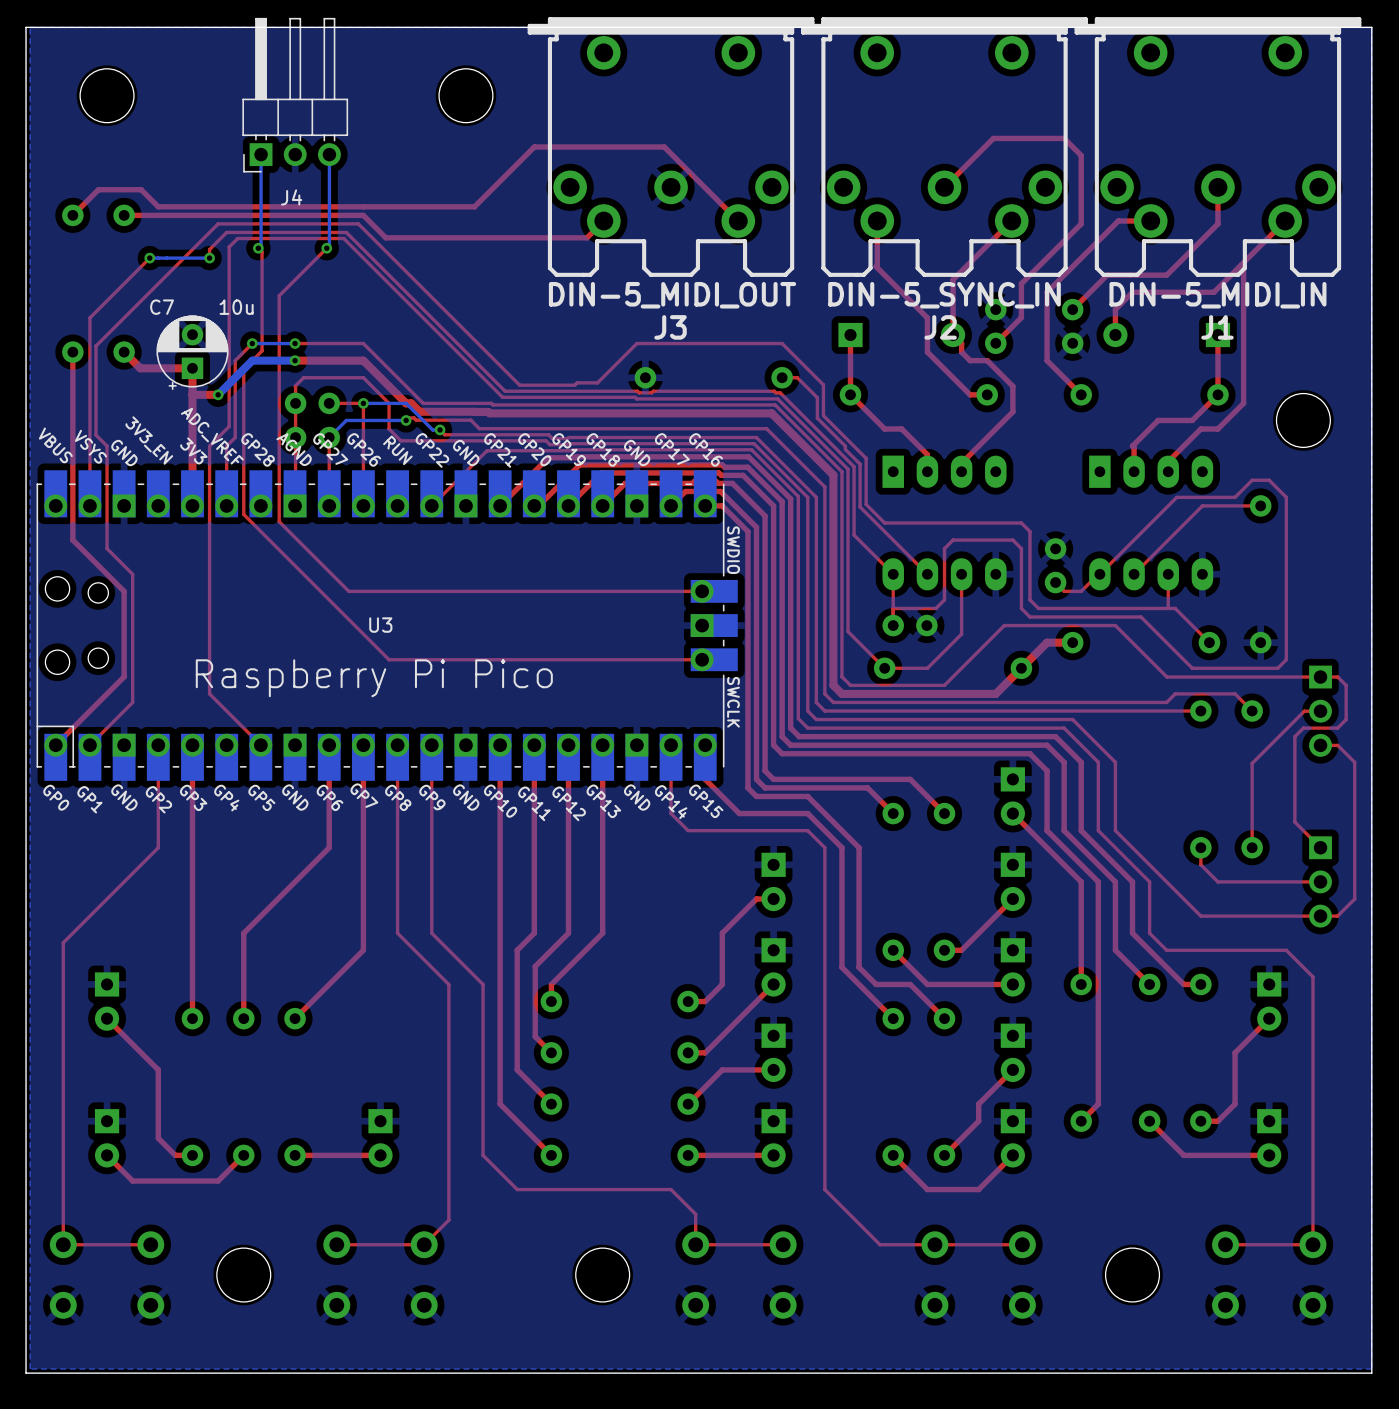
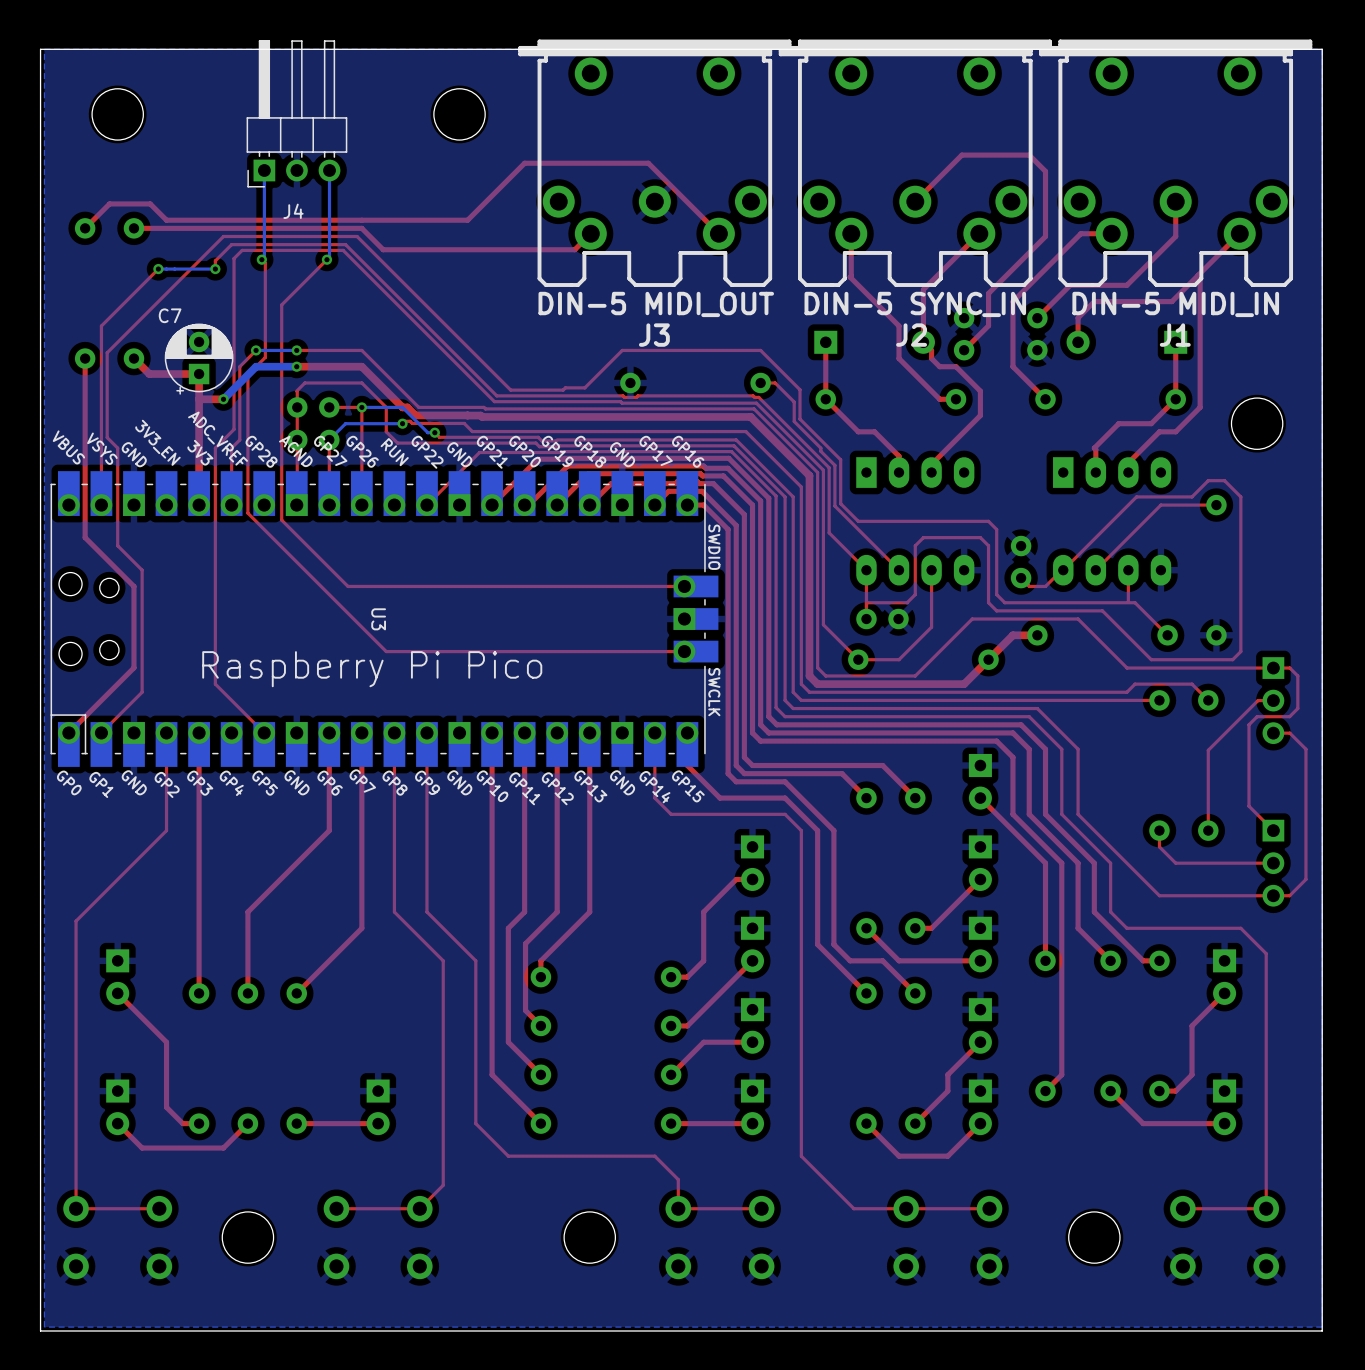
J3 value: DIN-5_MIDI_OUT (672, 295) -> DIN-5 MIDI_OUT (656, 304)
J2 value: DIN-5_SYNC_IN (944, 295) -> DIN-5 SYNC_IN (915, 304)
J1 value: DIN-5_MIDI_IN (1217, 295) -> DIN-5 MIDI_IN (1175, 304)
C7 value: 10u (236, 307) -> none
U3 name rotation: 0° (380, 625) -> 90° clockwise (378, 619)

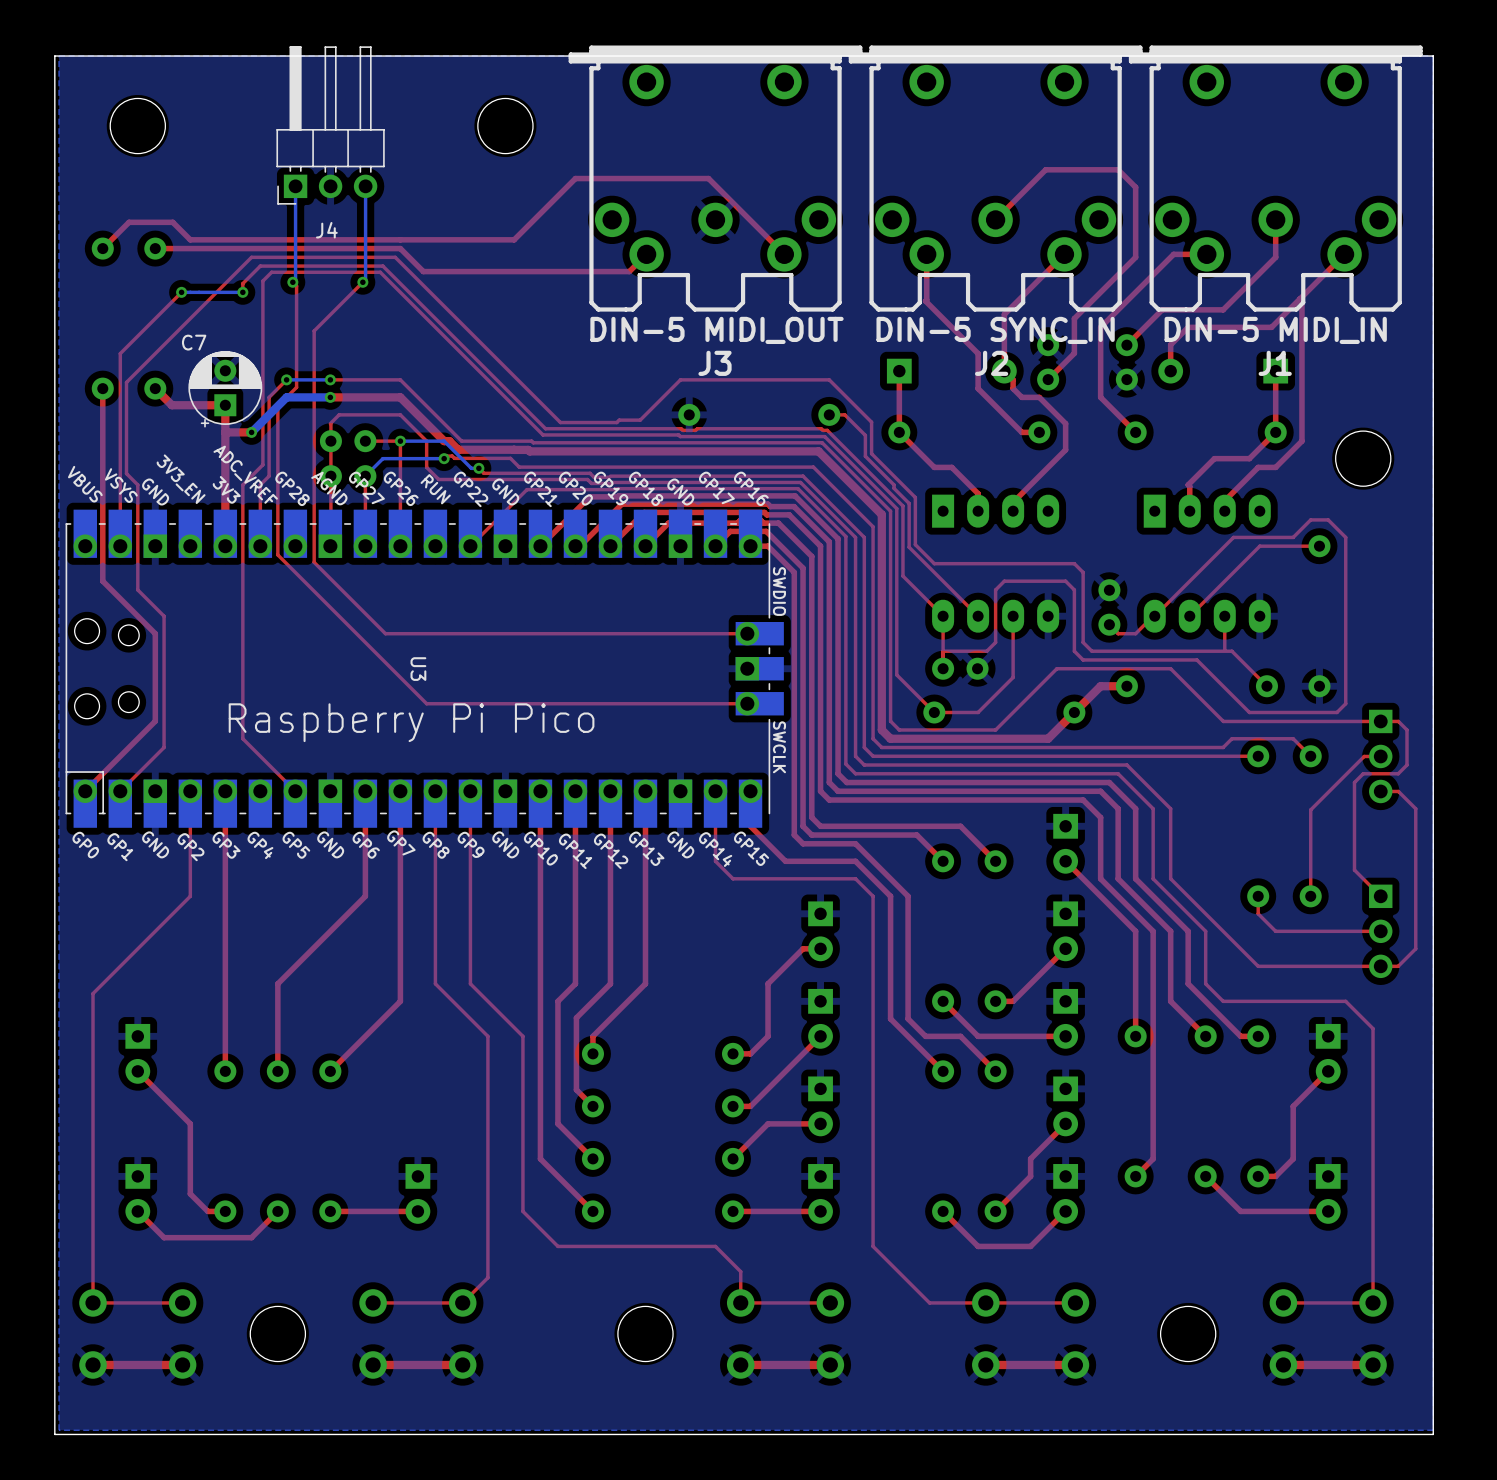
top track: none -> (182, 1364) (93, 1364)
top track: none -> (462, 1364) (373, 1364)
top track: none -> (830, 1364) (740, 1364)
top track: none -> (1075, 1364) (985, 1364)
top track: none -> (1373, 1364) (1283, 1364)

